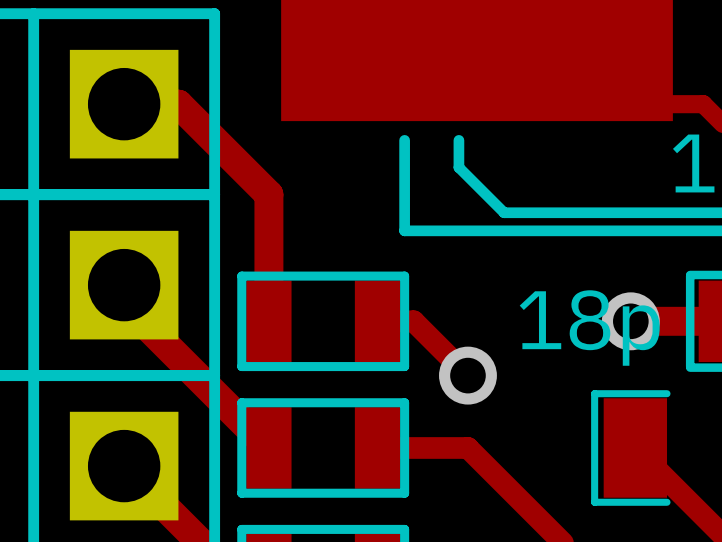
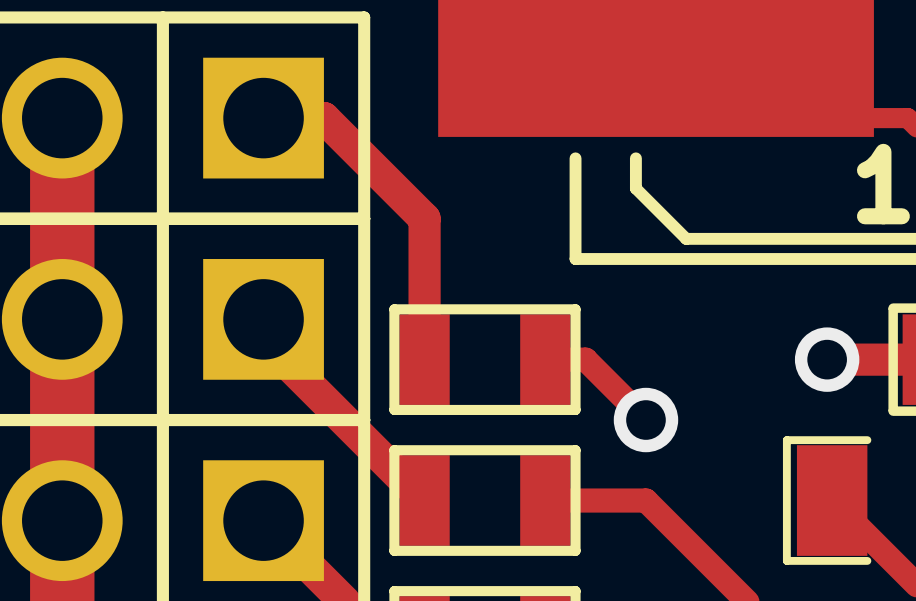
part value: 18p (589, 328) -> none

